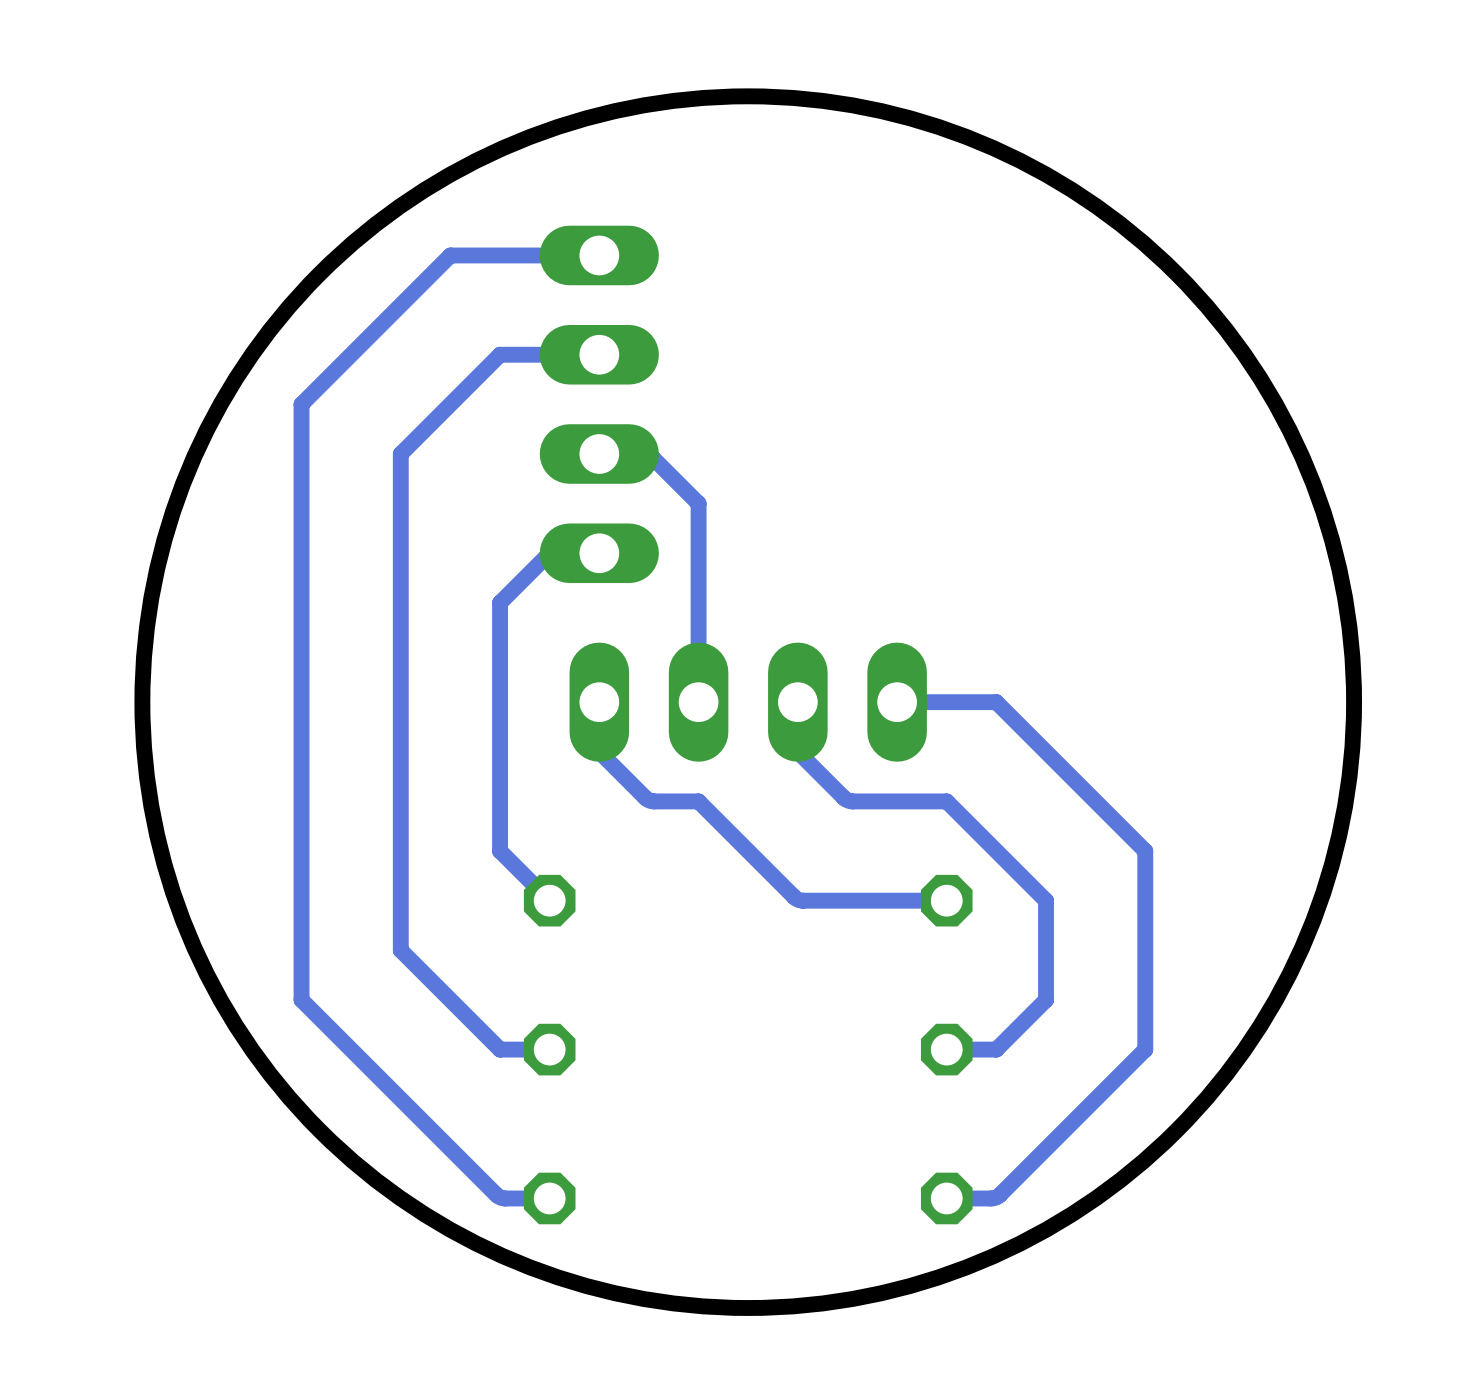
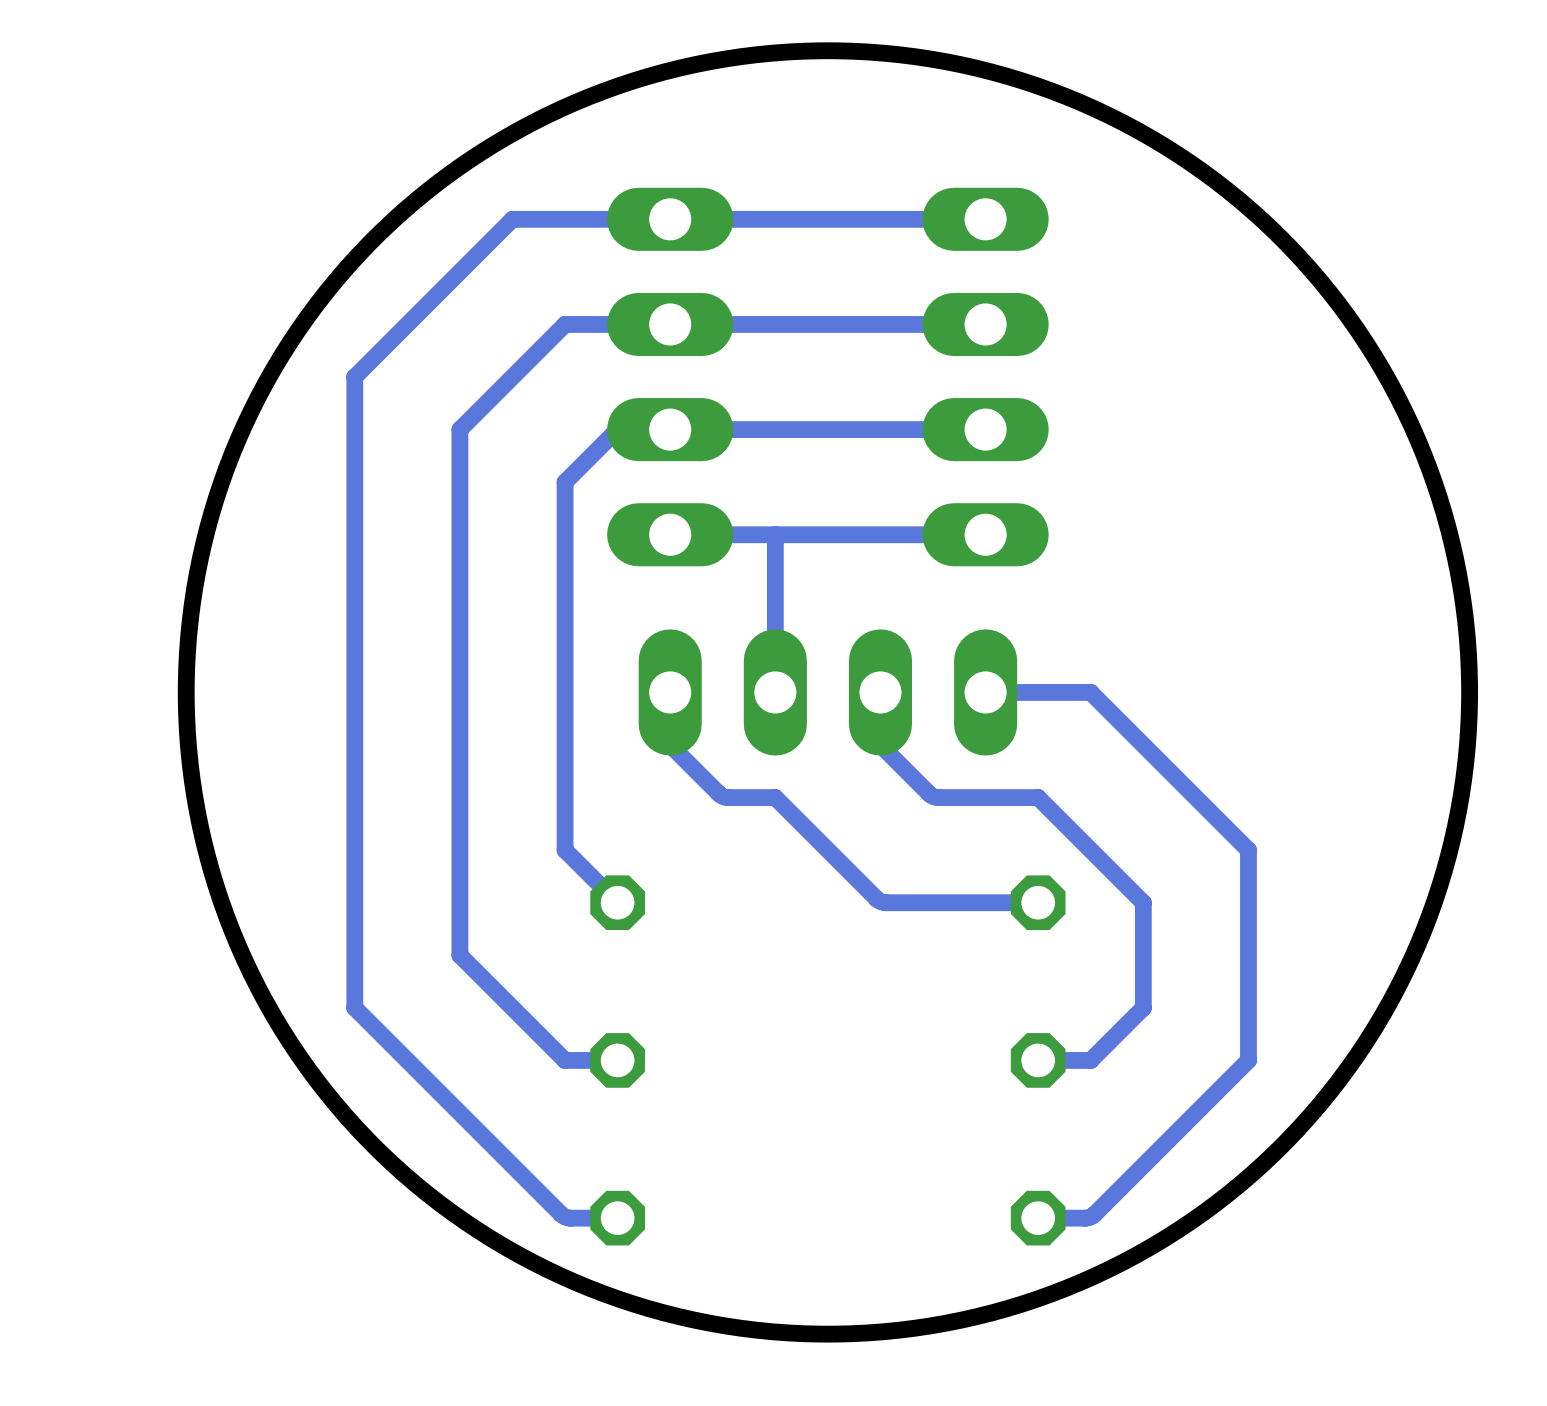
bottom track: none -> (985, 219) (670, 219)
bottom track: none -> (985, 324) (670, 324)
part: none -> (985, 377)
bottom track: (643, 454) (652, 457) (698, 503) (698, 553) -> (717, 429) (985, 429)
bottom track: (599, 553) (549, 553) (500, 602) -> (670, 429) (617, 429) (565, 482) (565, 587)
bottom track: none -> (985, 534) (670, 534)

